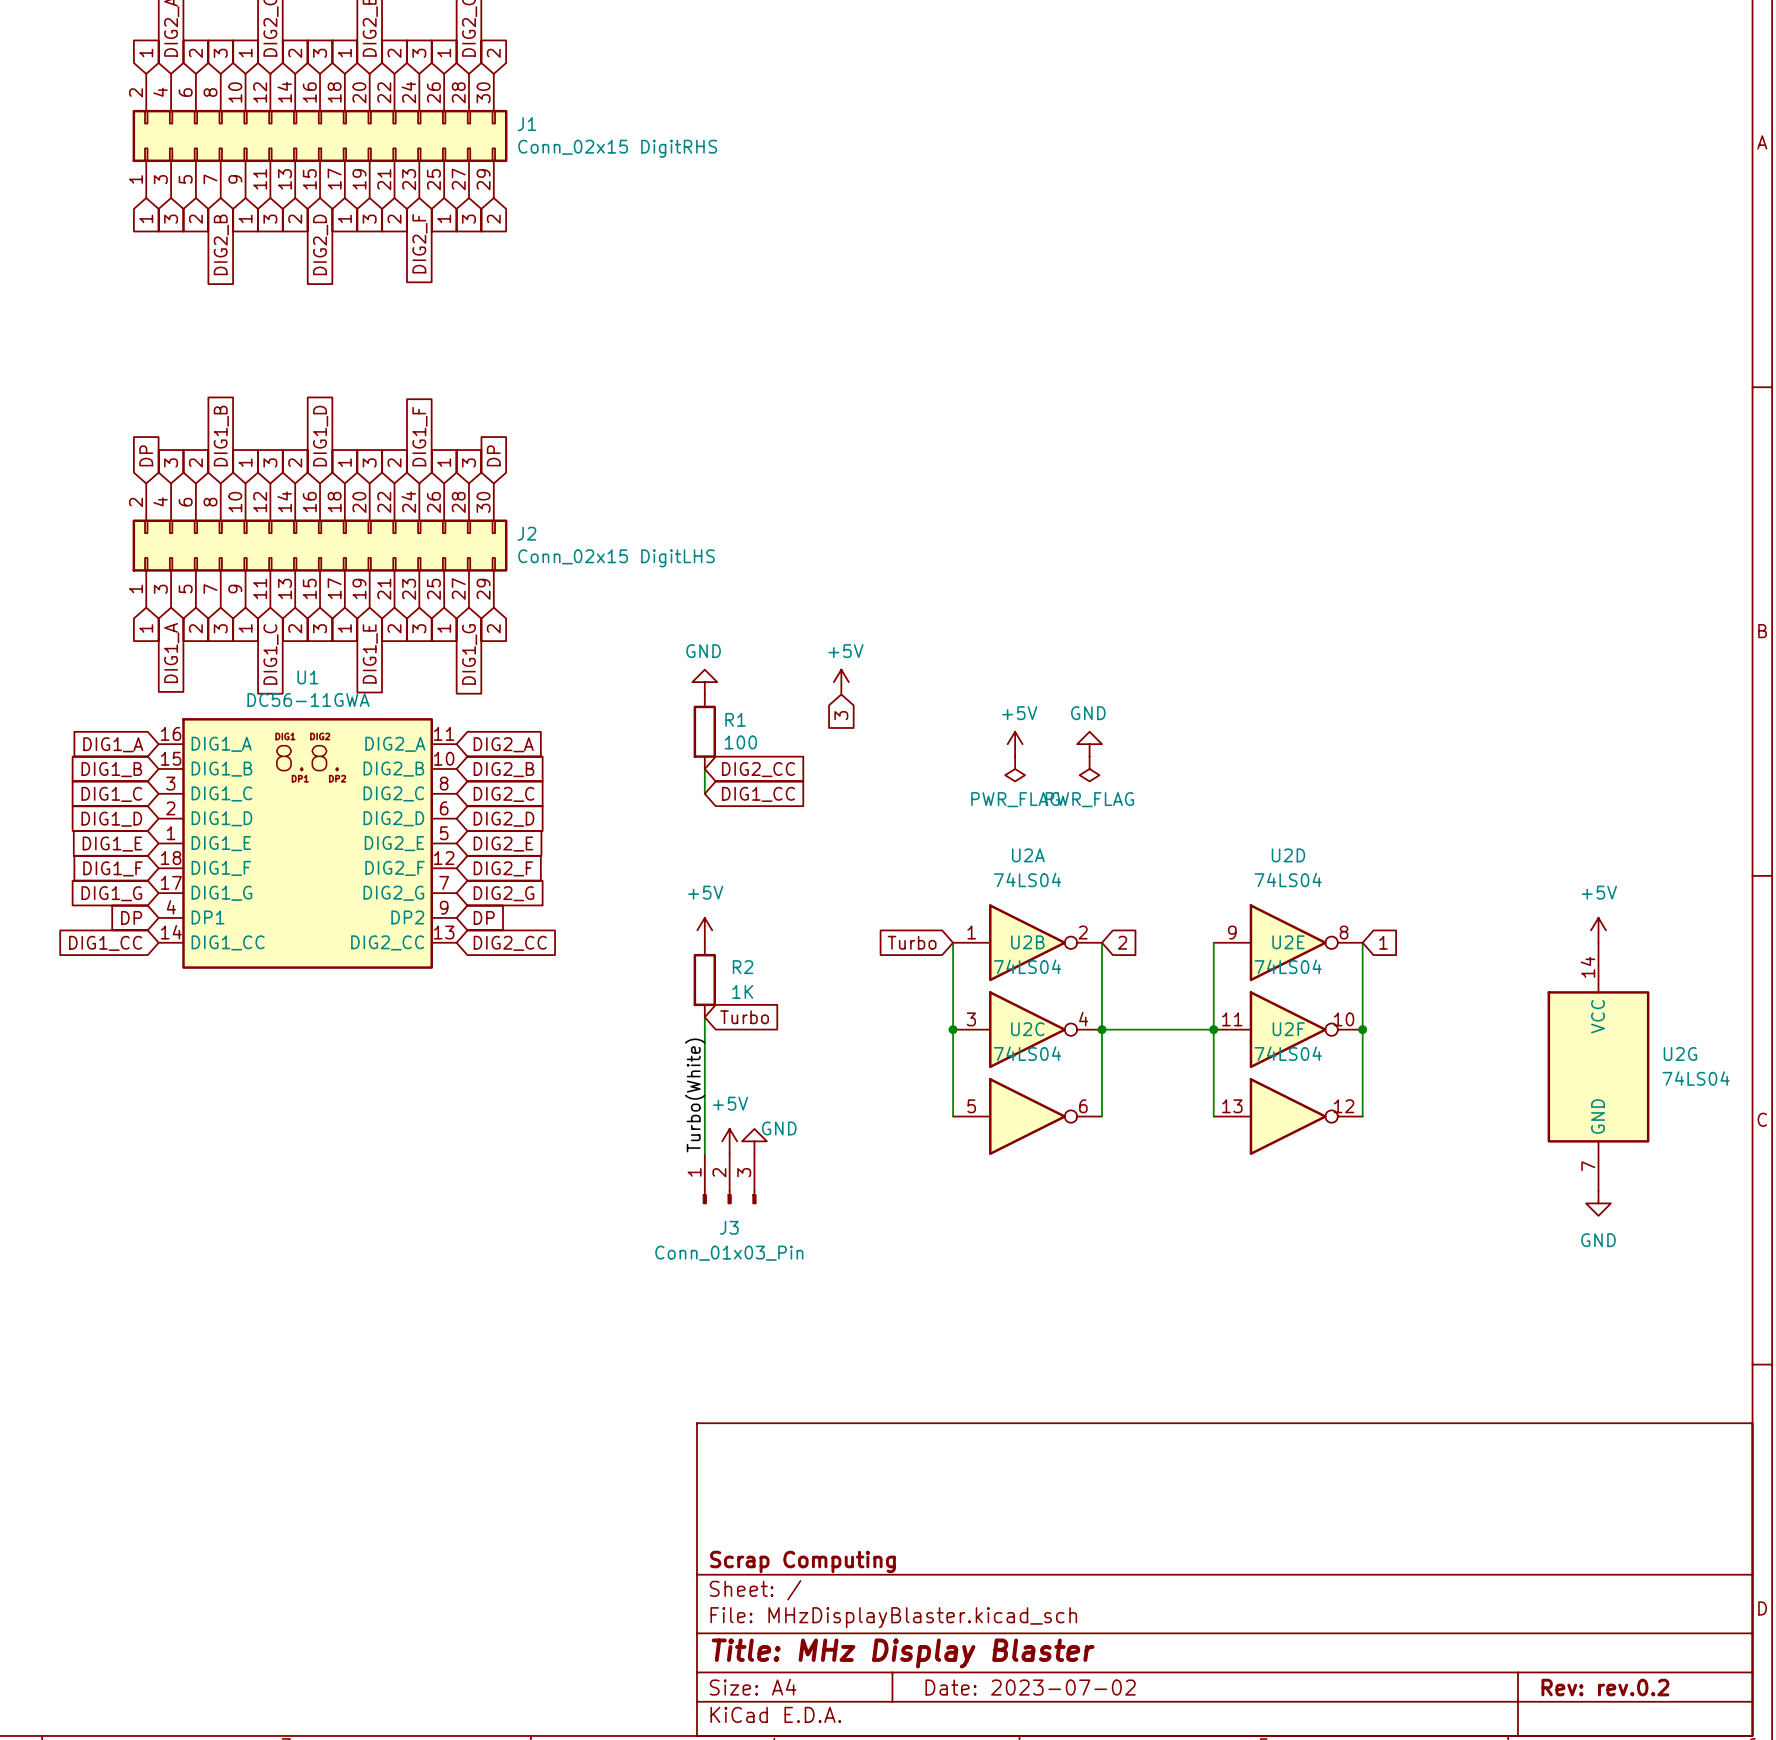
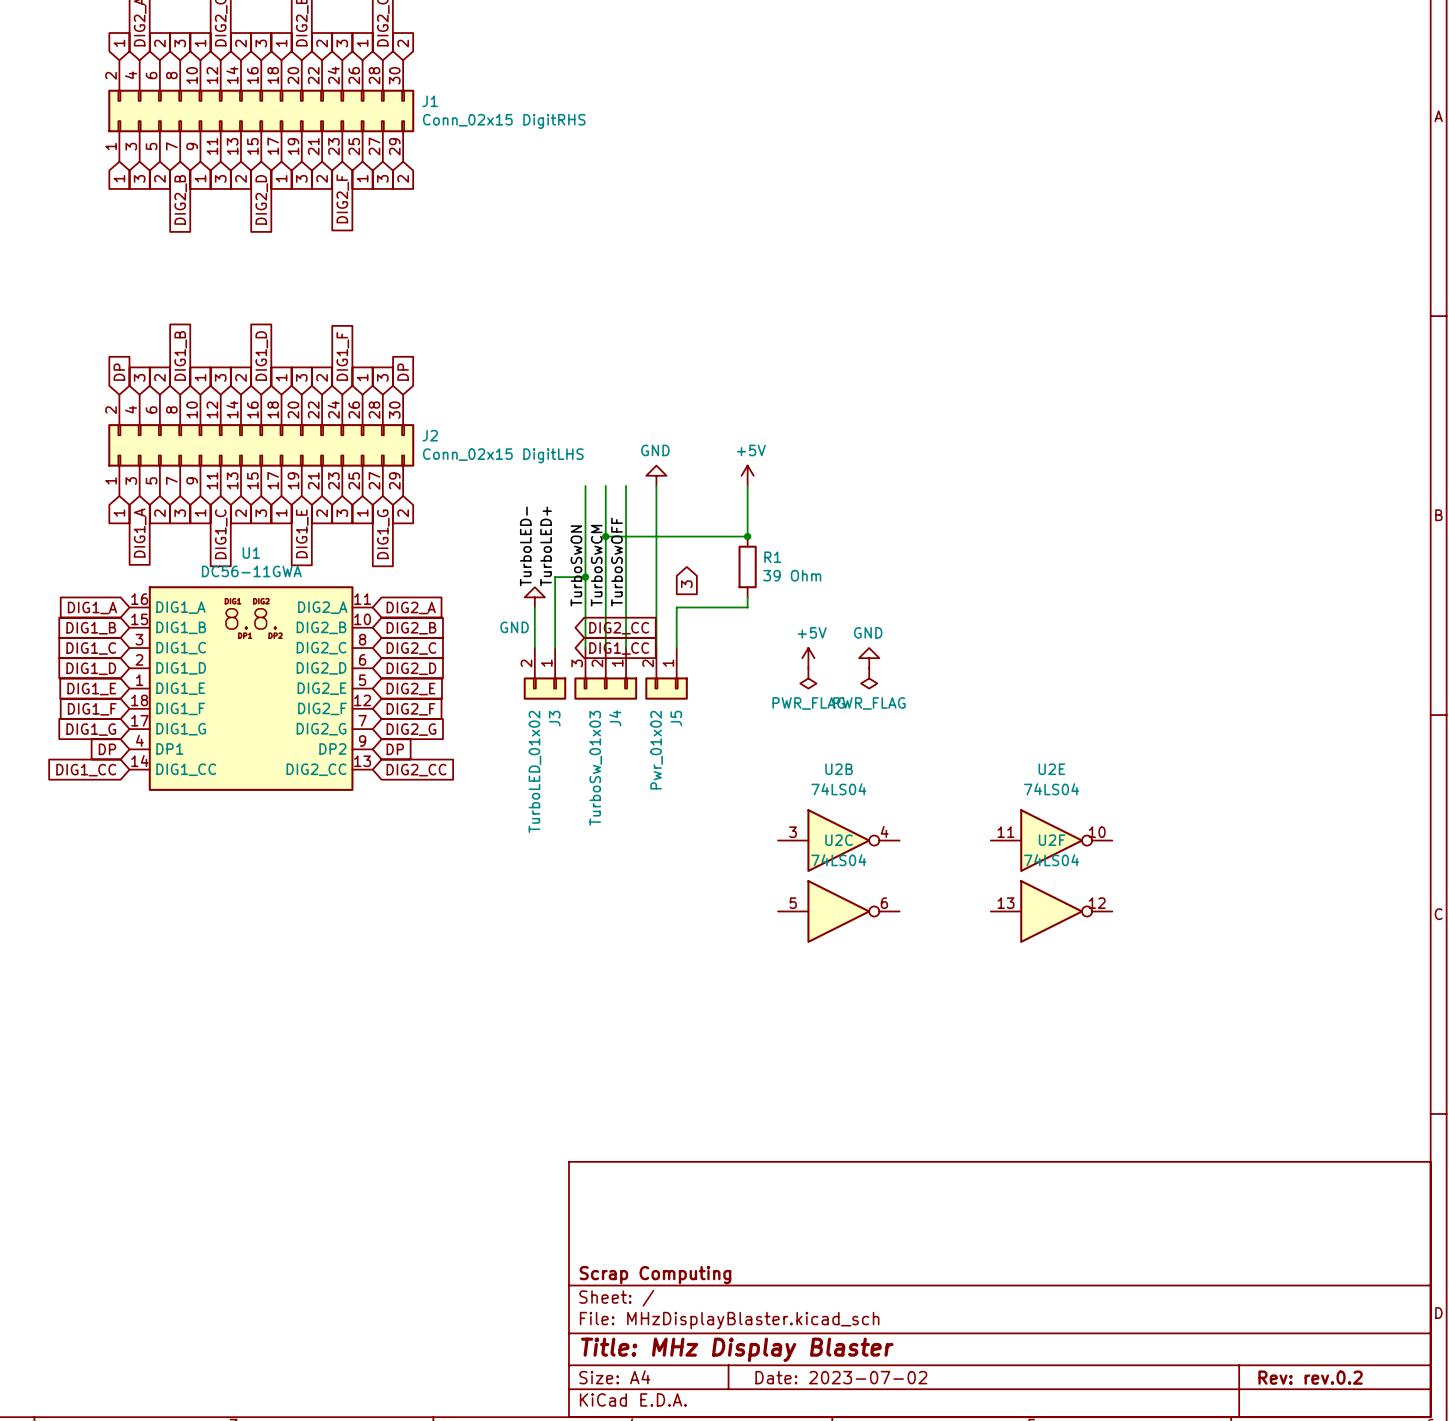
power symbol: none -> GND (656, 475)
power symbol: none -> +5V (747, 475)
wire: none -> (585, 485) (585, 648)
wire: none -> (605, 485) (605, 648)
wire: none -> (626, 485) (626, 648)
wire: none -> (656, 485) (656, 648)
wire: none -> (747, 485) (747, 536) (605, 536)
junction: none -> (605, 536)
junction: none -> (747, 536)
label: none -> TurboLED- (525, 546)
label: none -> TurboLED+ (546, 546)
power symbol: GND (704, 682) -> none
power symbol: +5V (841, 682) -> none
label: none -> TurboSwOFF (616, 562)
label: none -> TurboSwCM (596, 565)
label: none -> TurboSwON (576, 565)
wire: none -> (585, 577) (555, 577) (555, 648)
junction: none -> (585, 577)
power symbol: none -> GND (534, 597)
R1 position: (704, 731) -> (747, 566)
wire: none -> (747, 597) (747, 607) (676, 607) (676, 648)
R1 value: 100 (740, 742) -> 39 Ohm (792, 575)
wire: none -> (534, 607) (534, 648)
power symbol position: +5V (1015, 744) -> +5V (808, 658)
power symbol position: GND (1089, 744) -> GND (869, 658)
wire: (704, 768) (704, 793) -> none
power symbol: PWR_FLAG (1015, 768) -> none
power symbol: PWR_FLAG (1089, 768) -> none
J4: none -> TurboSw_01x03 (605, 673)
J5: none -> Pwr_01x02 (666, 673)
power symbol: none -> PWR_FLAG (808, 678)
power symbol: none -> PWR_FLAG (869, 678)
power symbol: +5V (704, 930) -> none
power symbol: +5V (1598, 930) -> none
global label: Turbo (912, 942) -> none
wire: (953, 942) (953, 1116) -> none
U2A: 74LS04 (1027, 942) -> none
wire: (1102, 942) (1102, 1116) -> none
global label: 2 (1122, 942) -> none
wire: (1213, 942) (1213, 1116) -> none
U2D: 74LS04 (1288, 942) -> none
wire: (1362, 942) (1362, 1116) -> none
global label: 1 (1383, 942) -> none
R2: 1K (704, 980) -> none
wire: (704, 1017) (704, 1153) -> none
global label: Turbo (744, 1017) -> none
junction: (953, 1029) -> none
wire: (1102, 1029) (1213, 1029) -> none
junction: (1102, 1029) -> none
junction: (1213, 1029) -> none
junction: (1362, 1029) -> none
U2G: 74LS04 (1598, 1066) -> none
label: Turbo(White) (695, 1095) -> none
power symbol: +5V (729, 1141) -> none
power symbol: GND (754, 1141) -> none
J3 symbol: [702, 1153, 757, 1205] -> [523, 648, 567, 700]
power symbol: GND (1598, 1203) -> none
J3 value: Conn_01x03_Pin (729, 1253) -> TurboLED_01x02 (534, 771)

